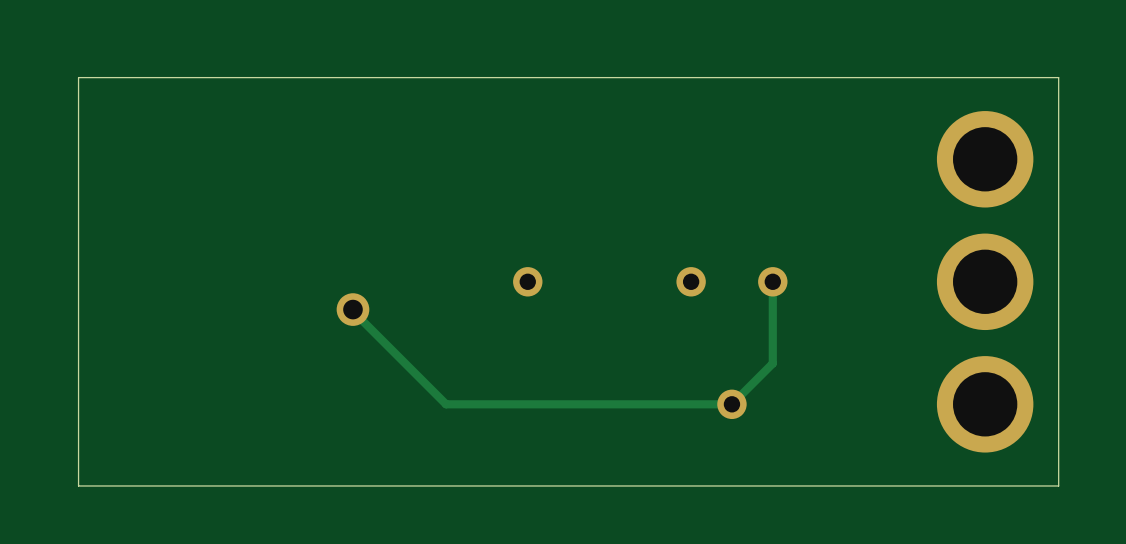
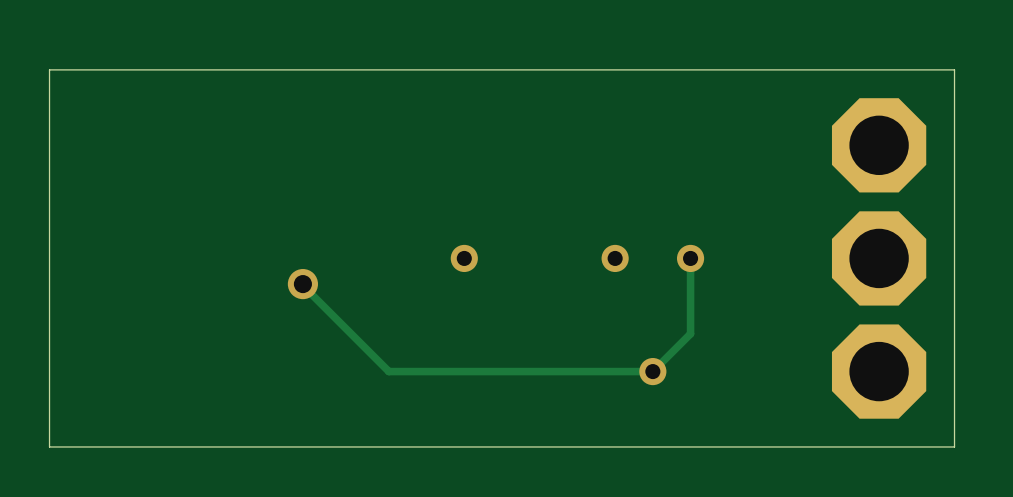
part: none -> (879, 145)
via: (985, 159) -> none
part: none -> (879, 258)
via: (985, 281) -> none
part: none -> (879, 371)
via: (985, 404) -> none

